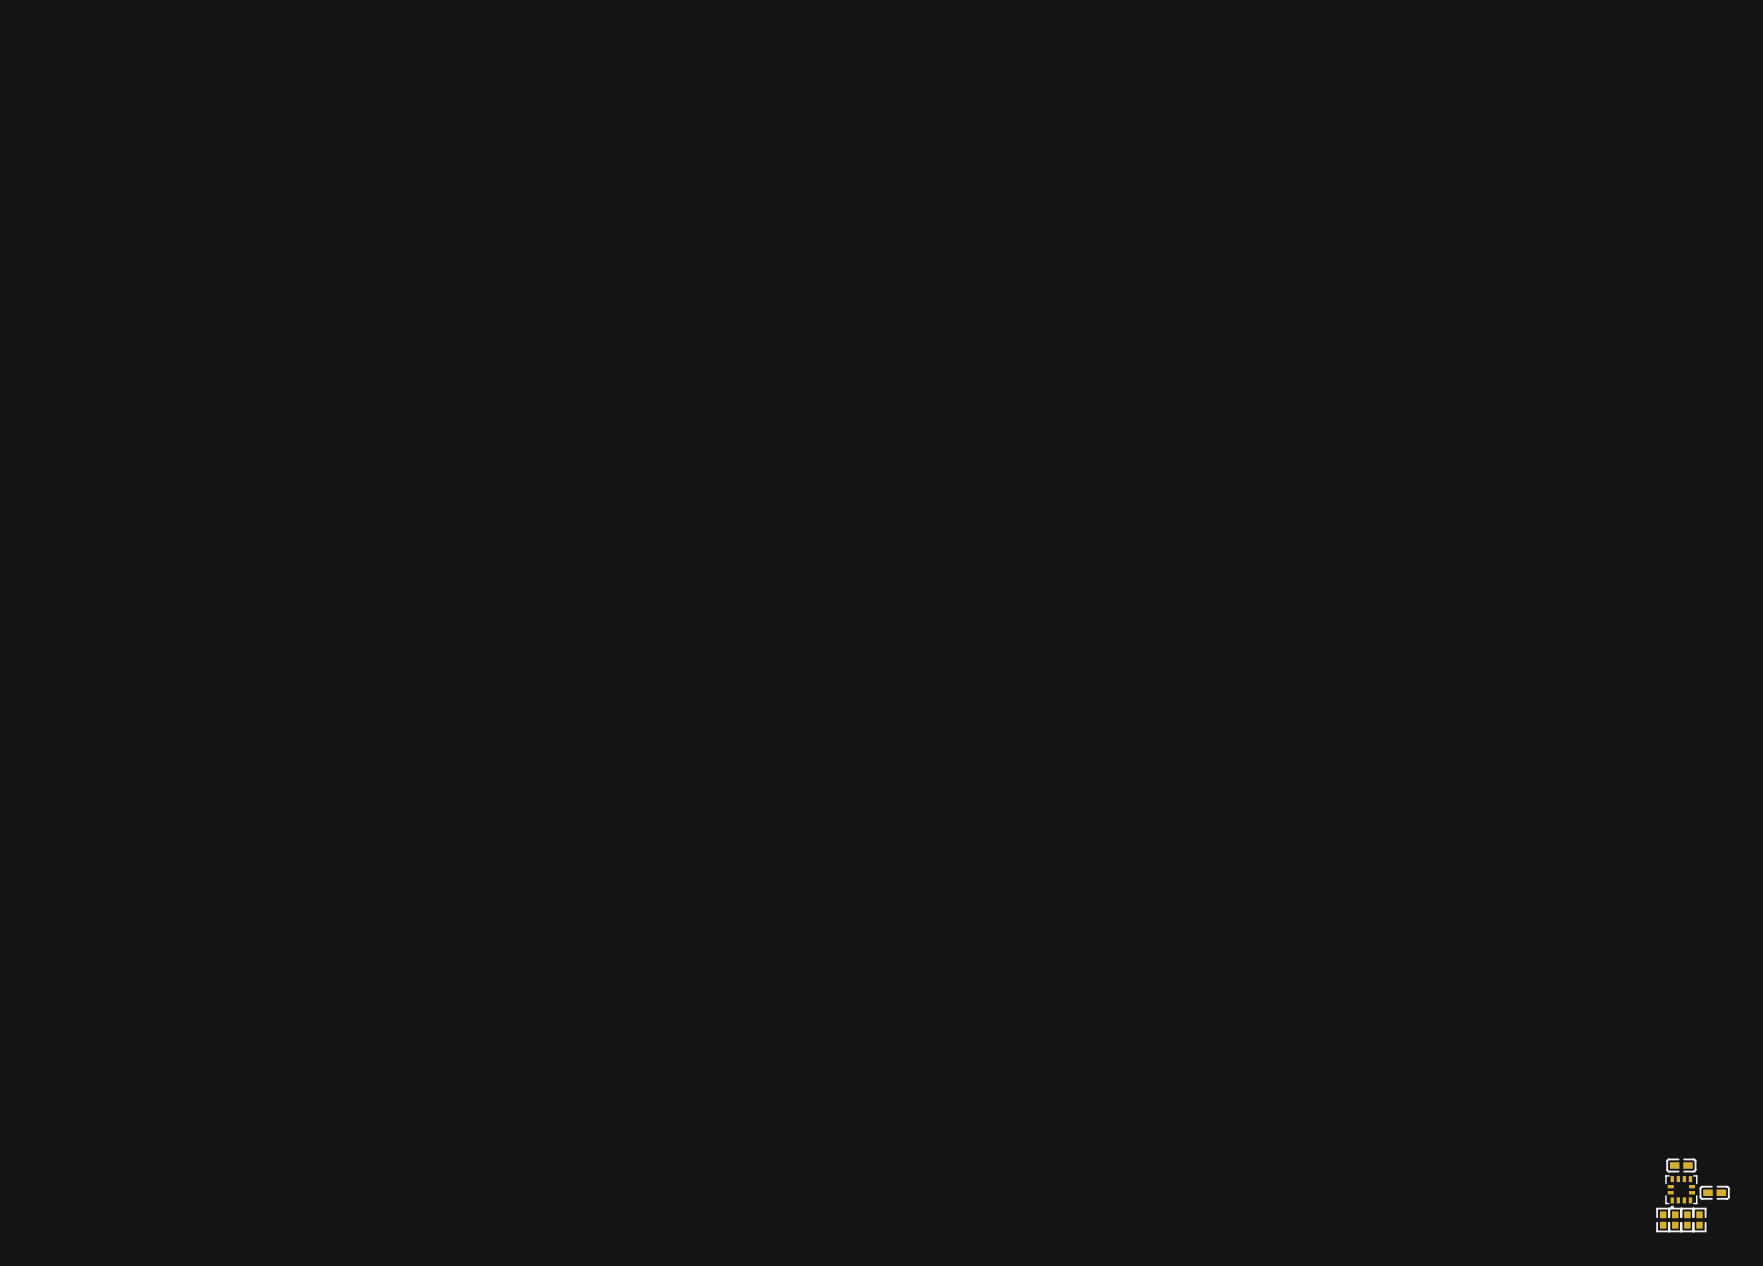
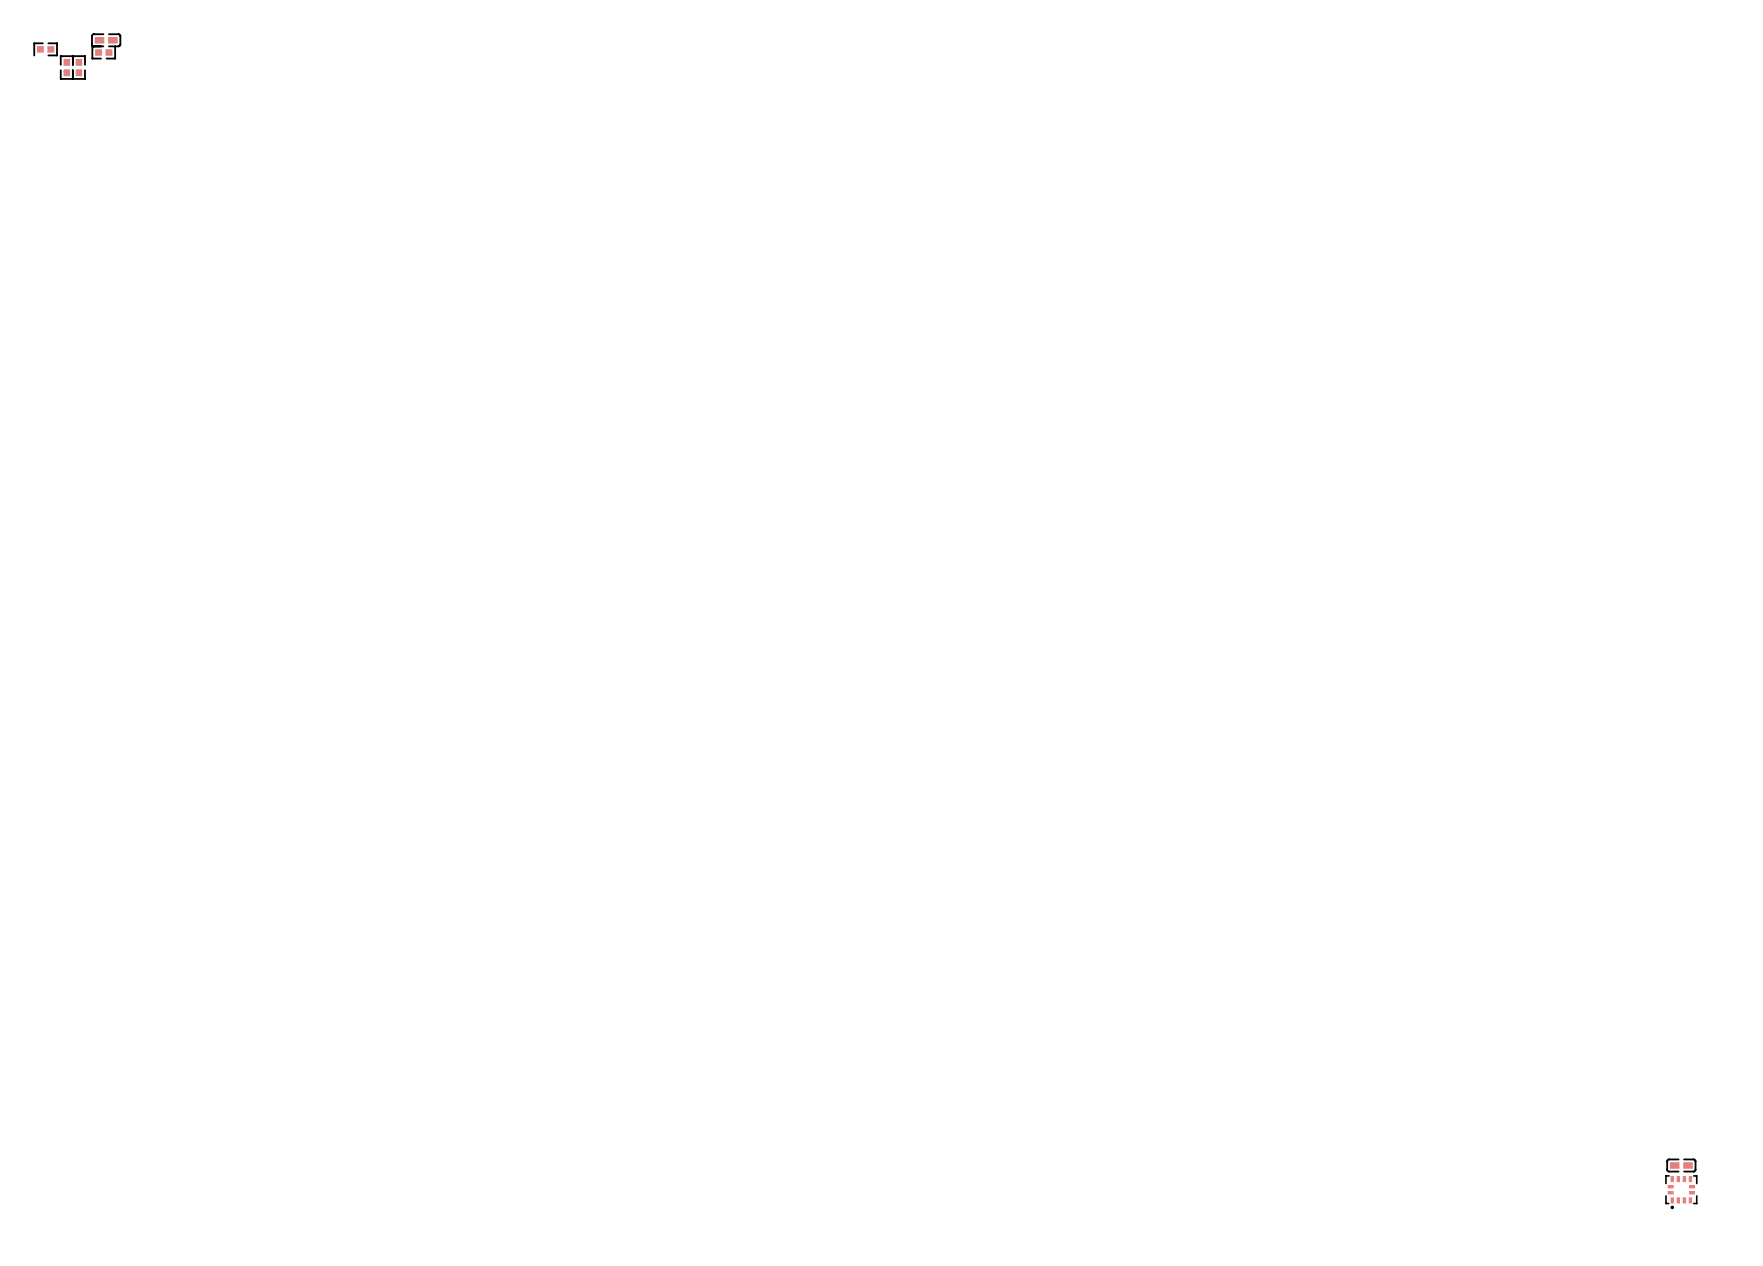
part: none -> (106, 40)
part: none -> (45, 49)
part: none -> (103, 52)
part: none -> (66, 67)
part: none -> (78, 67)
part: (1714, 1192) -> none
part: (1663, 1220) -> none
part: (1675, 1220) -> none
part: (1687, 1220) -> none
part: (1699, 1220) -> none

